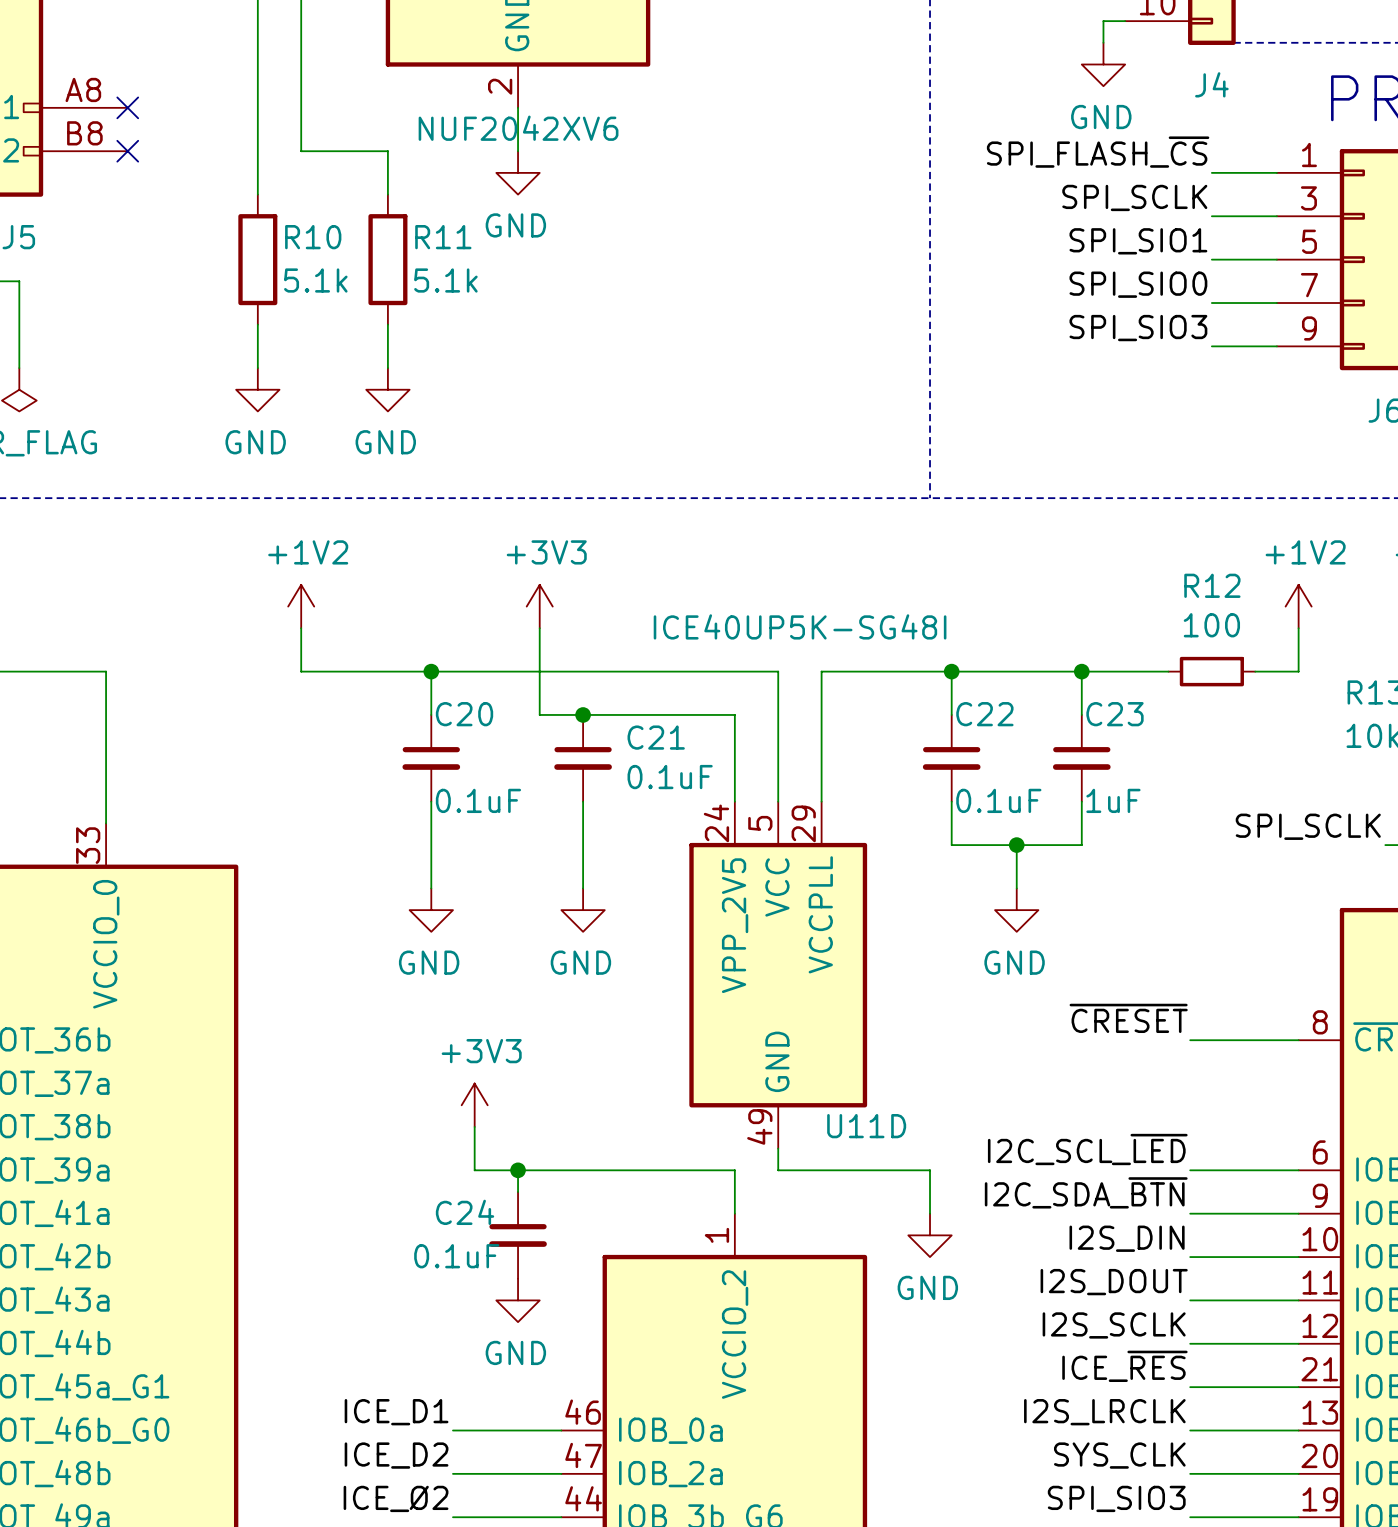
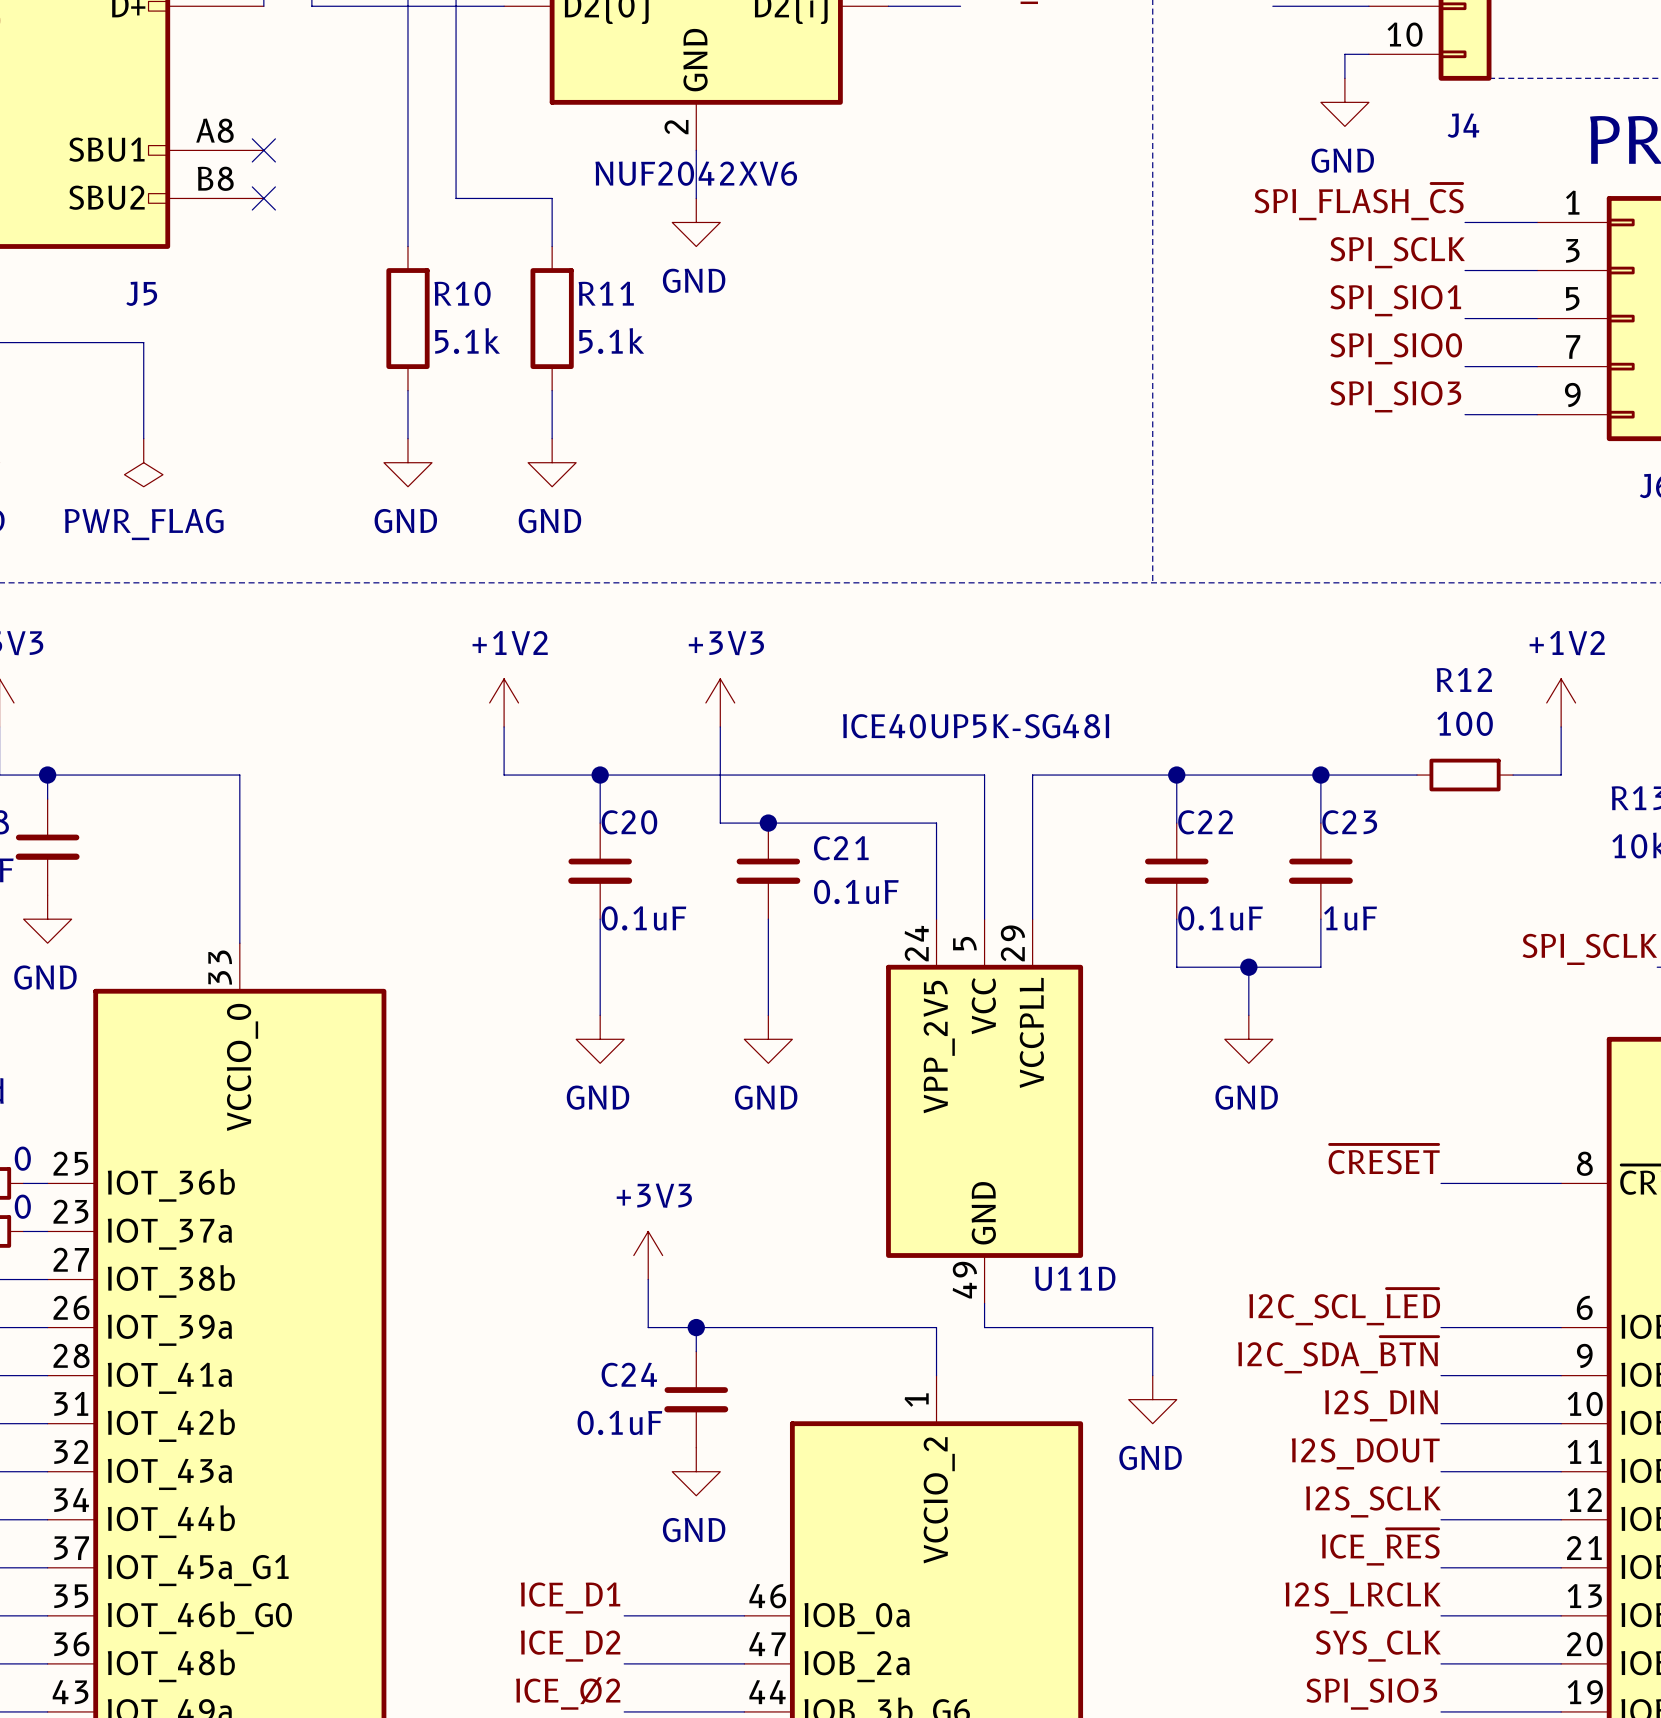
power symbol position: +1V2 (301, 606) -> +1V2 (504, 702)
wire: (301, 628) (301, 671) (344, 671) -> (504, 726) (504, 775)

